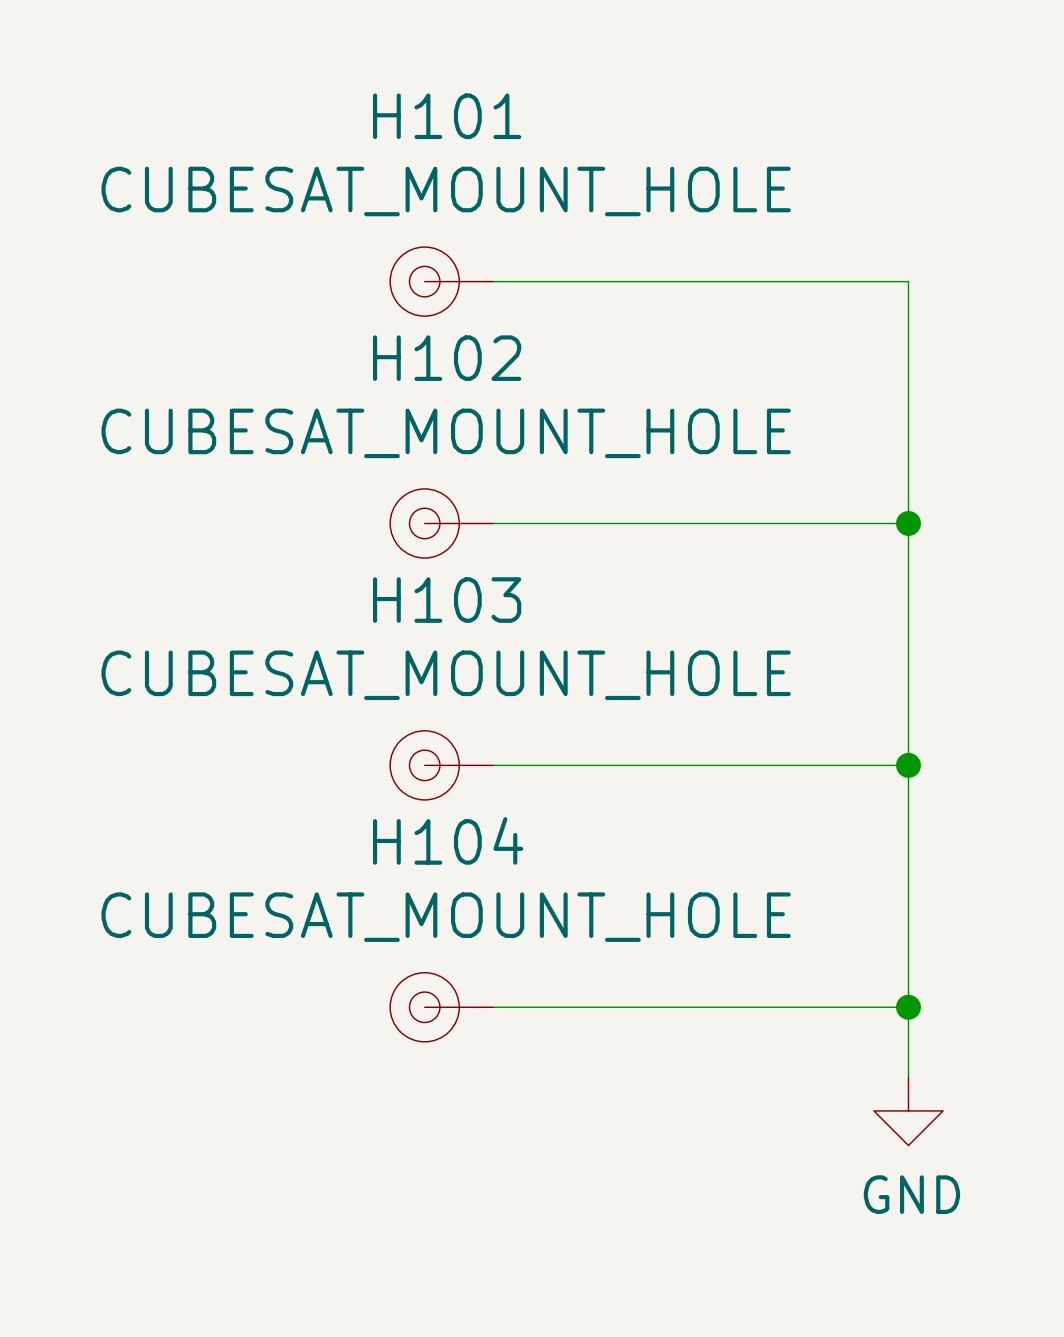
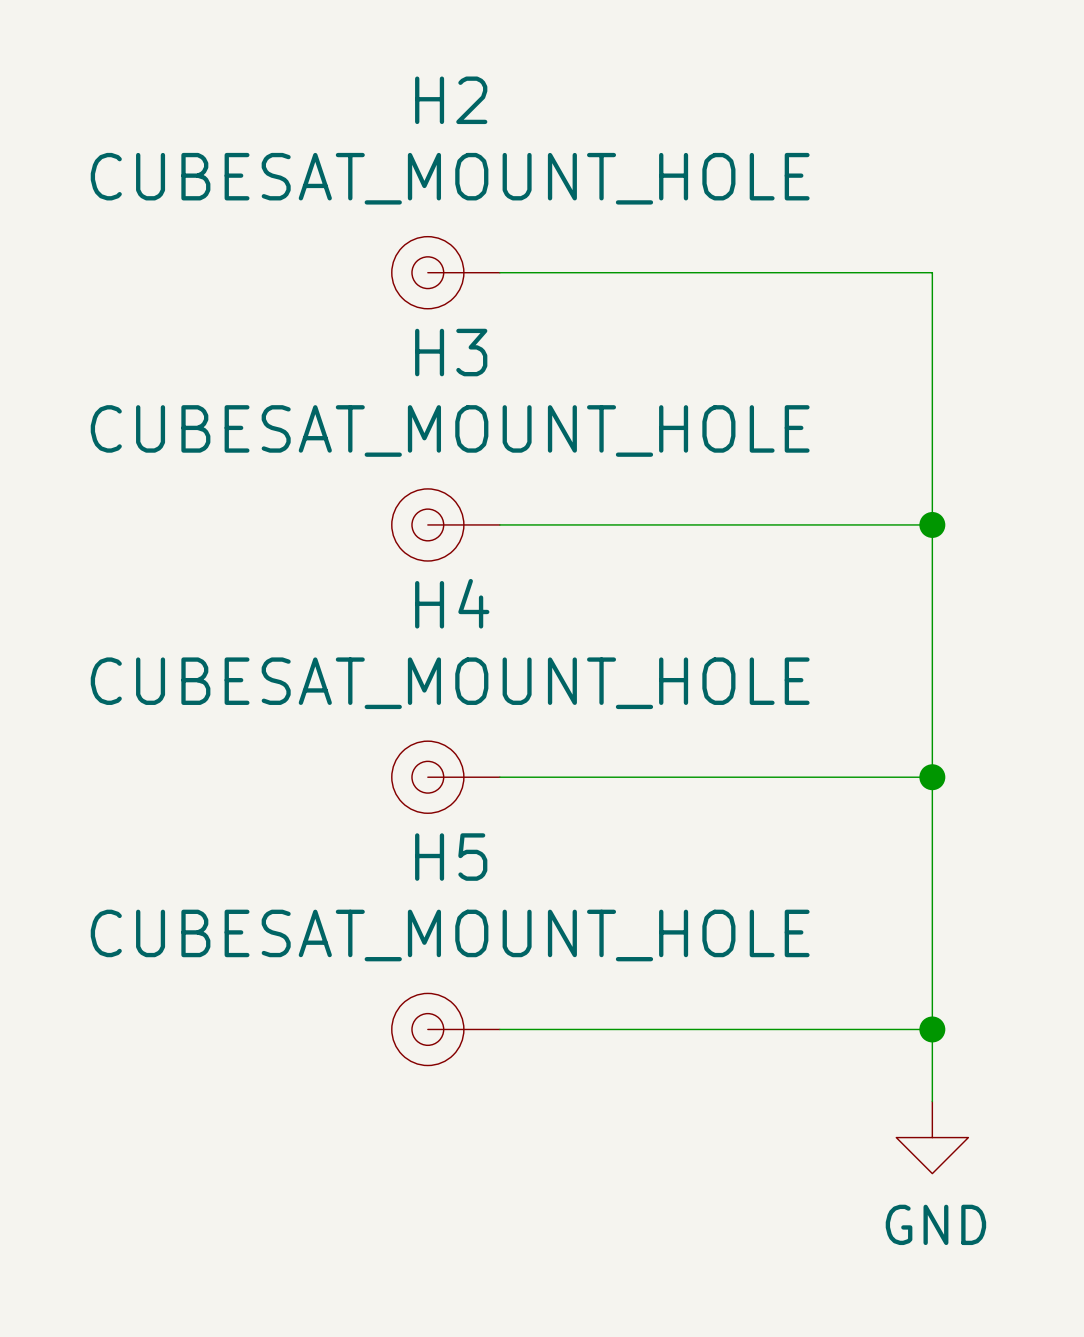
H101 name: H101 (447, 116) -> H2 (451, 100)
H102 name: H102 (447, 358) -> H3 (451, 352)
H103 name: H103 (447, 600) -> H4 (452, 603)
H104 name: H104 (448, 840) -> H5 (451, 857)

